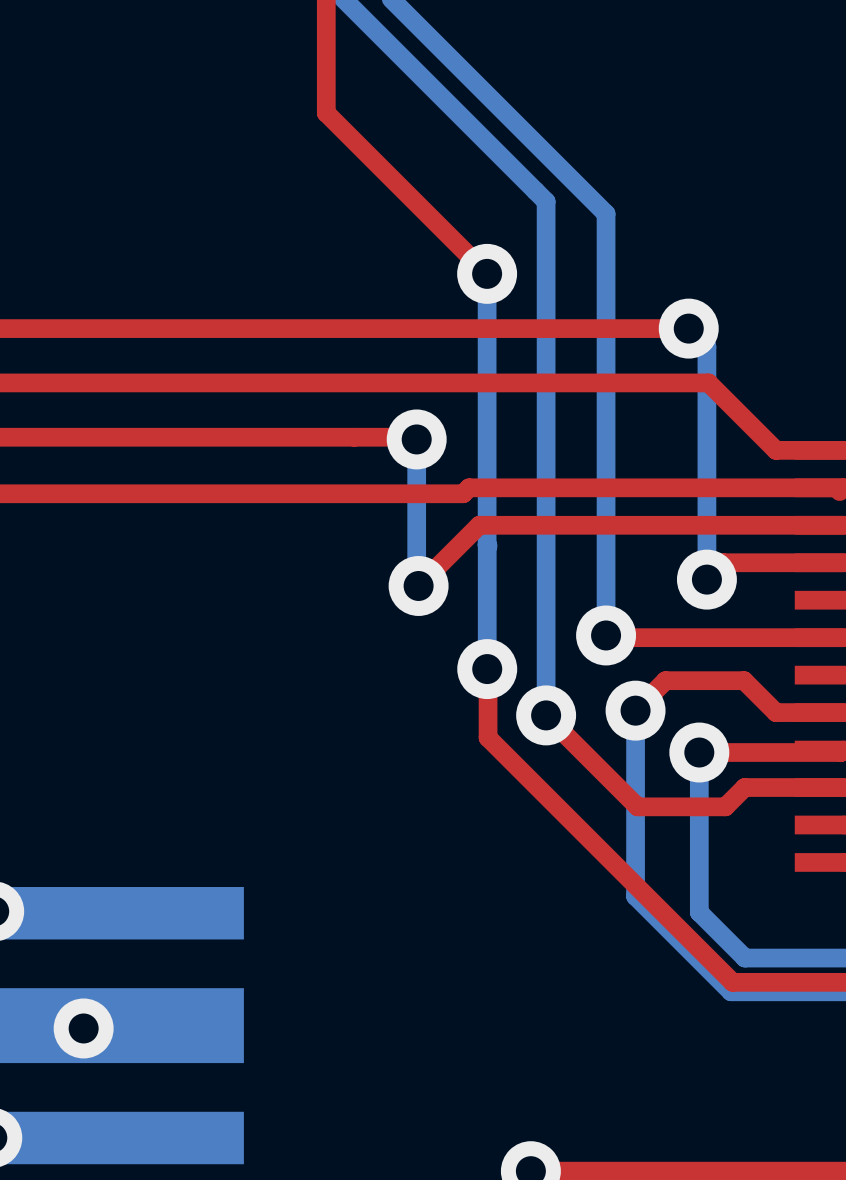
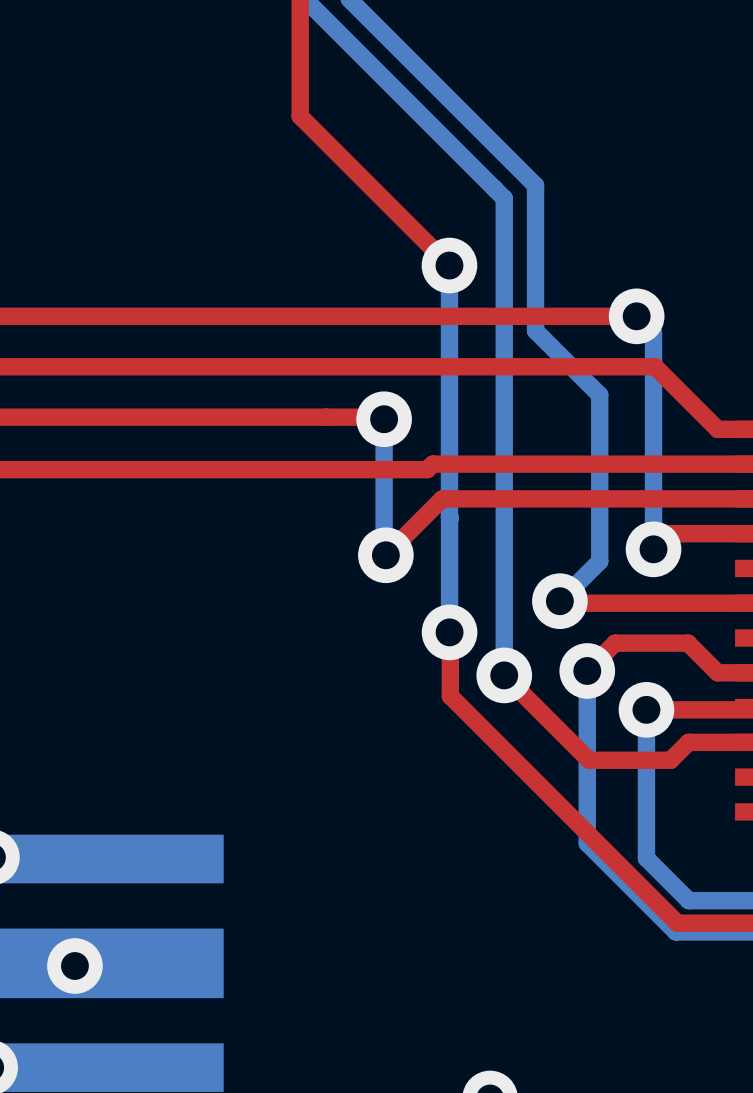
bottom track: (579, 187) (606, 213) (606, 635) -> (535, 185) (535, 330) (599, 395) (599, 561) (559, 601)

